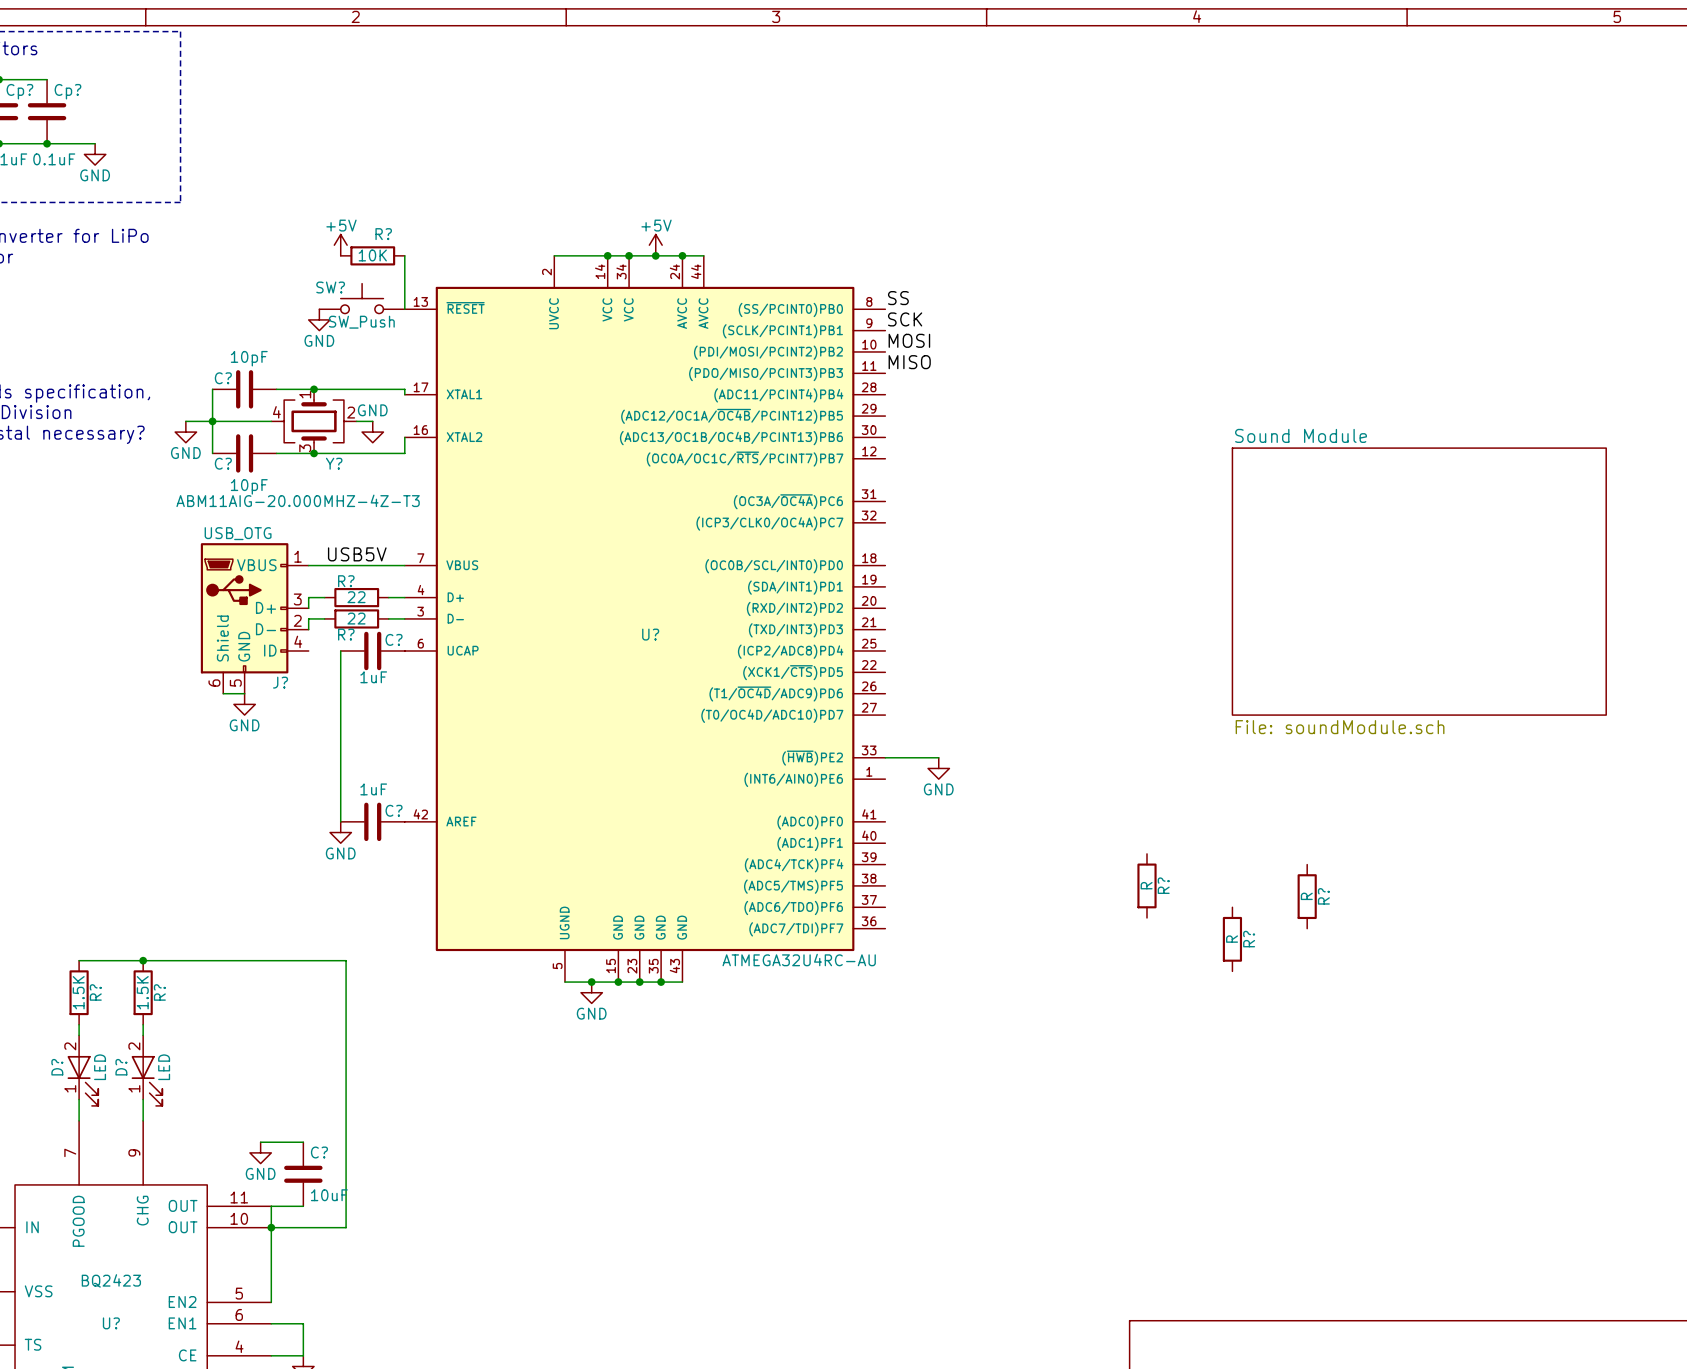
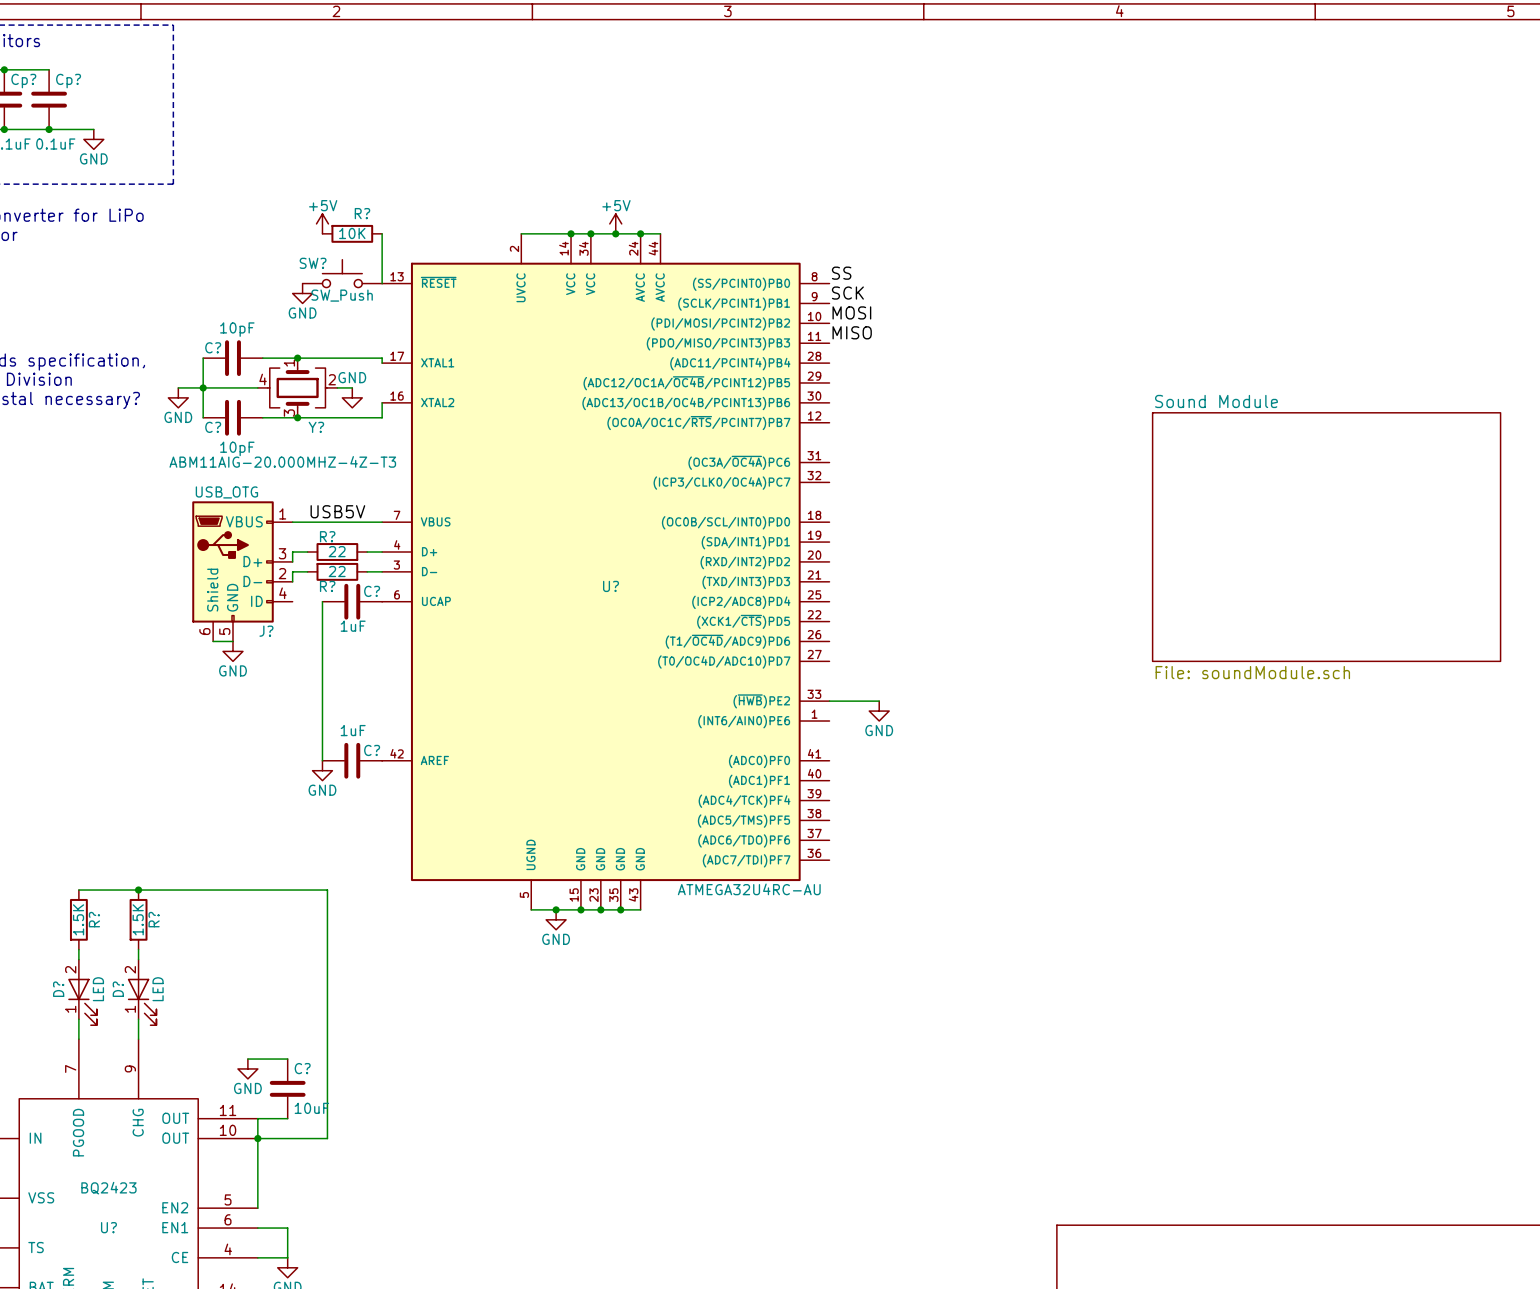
R?: R (1146, 885) -> none
R?: R (1307, 896) -> none
R?: R (1232, 939) -> none

